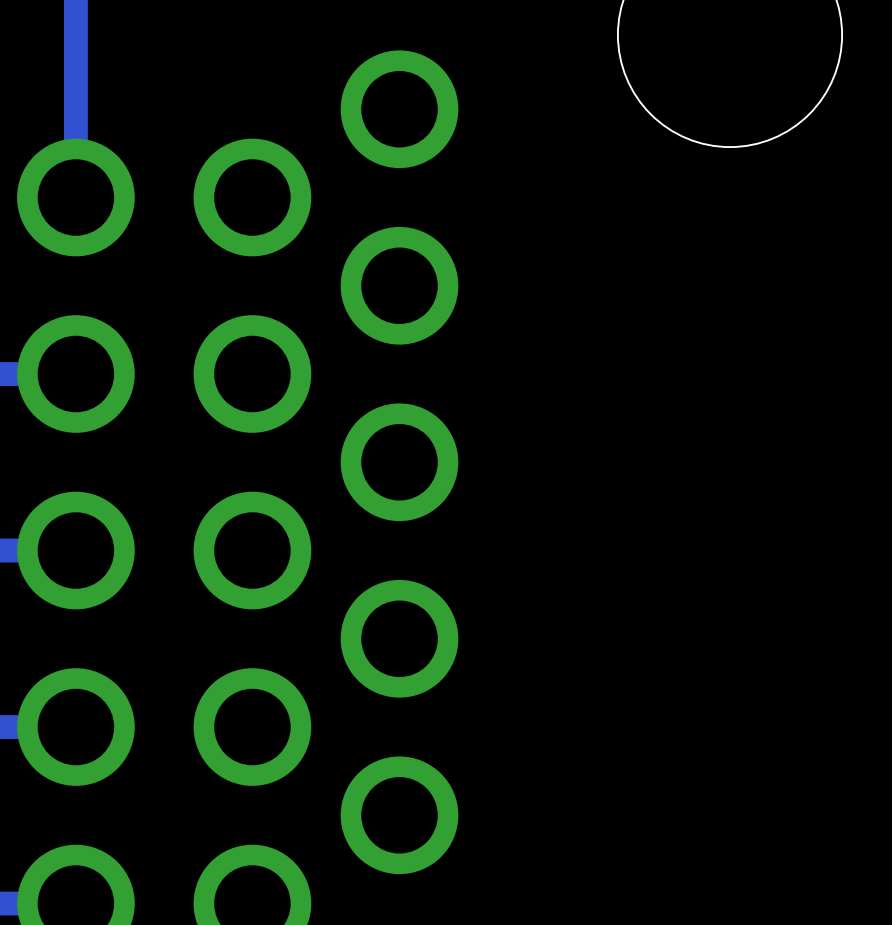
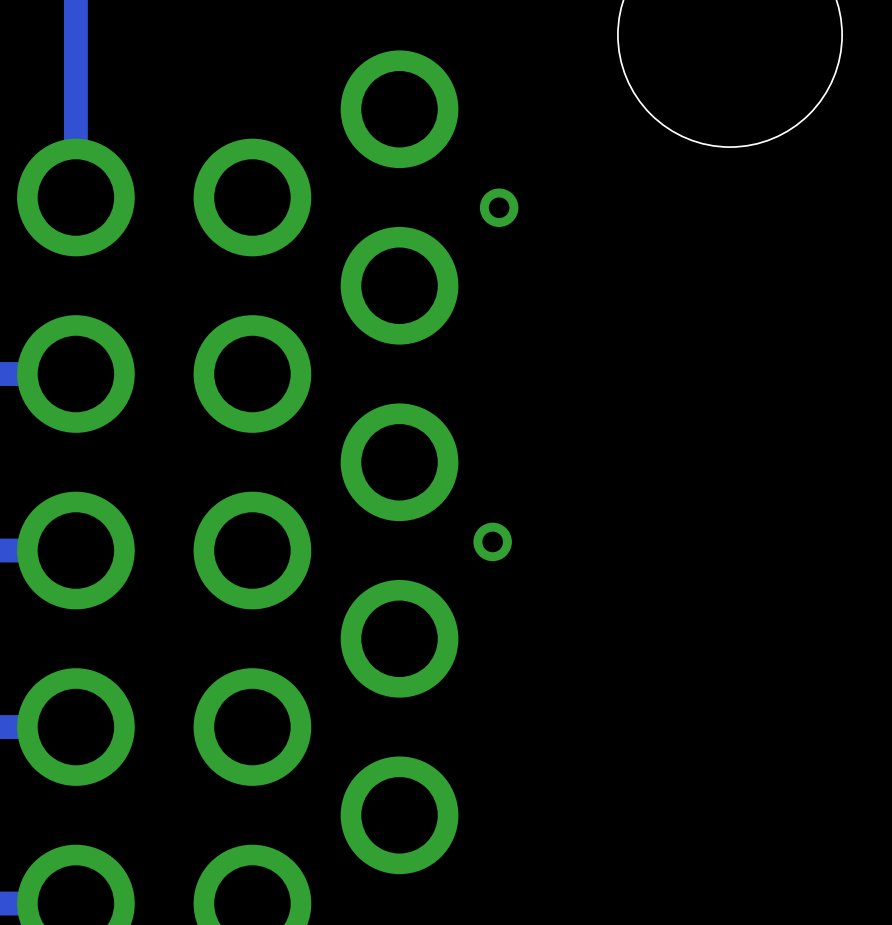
via: none -> (499, 207)
via: none -> (492, 541)

